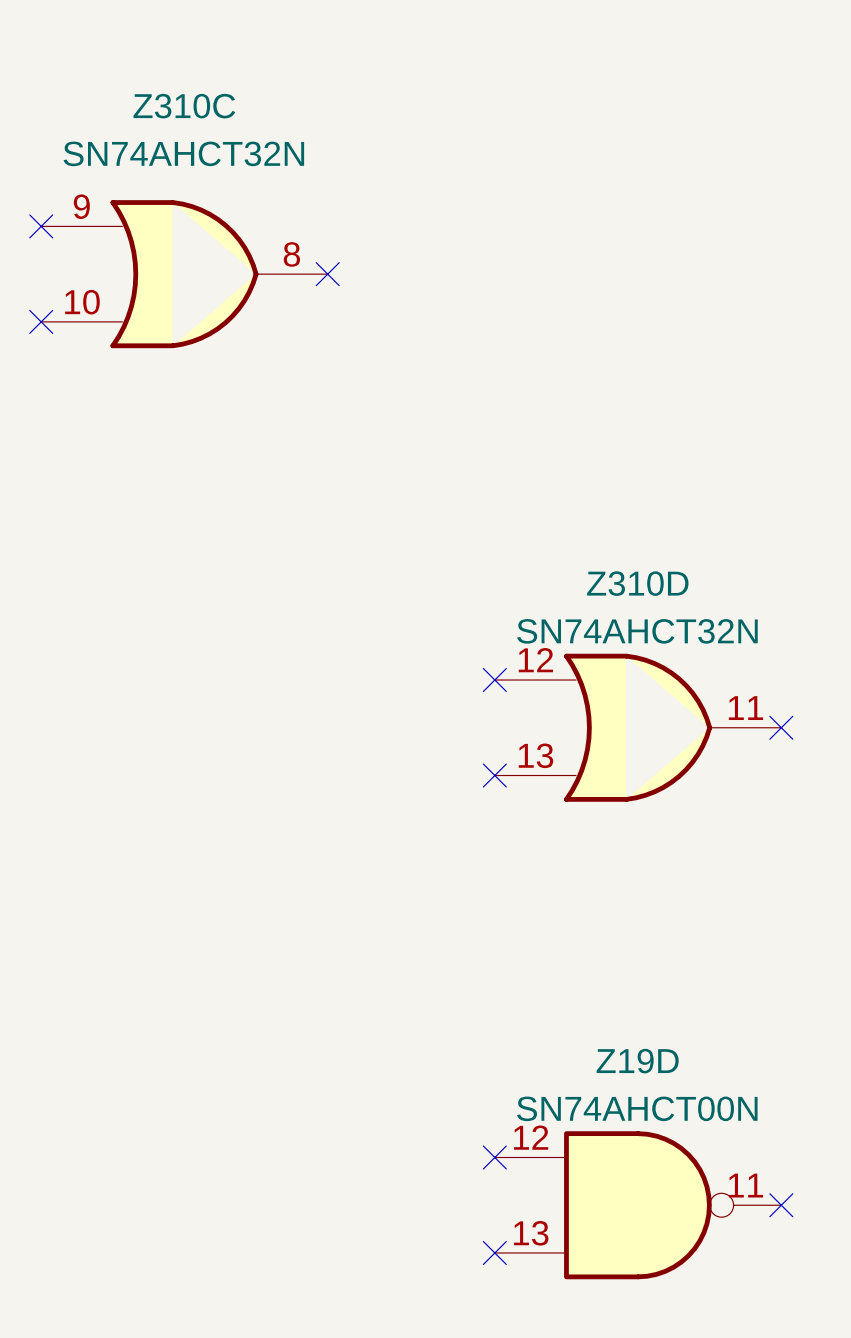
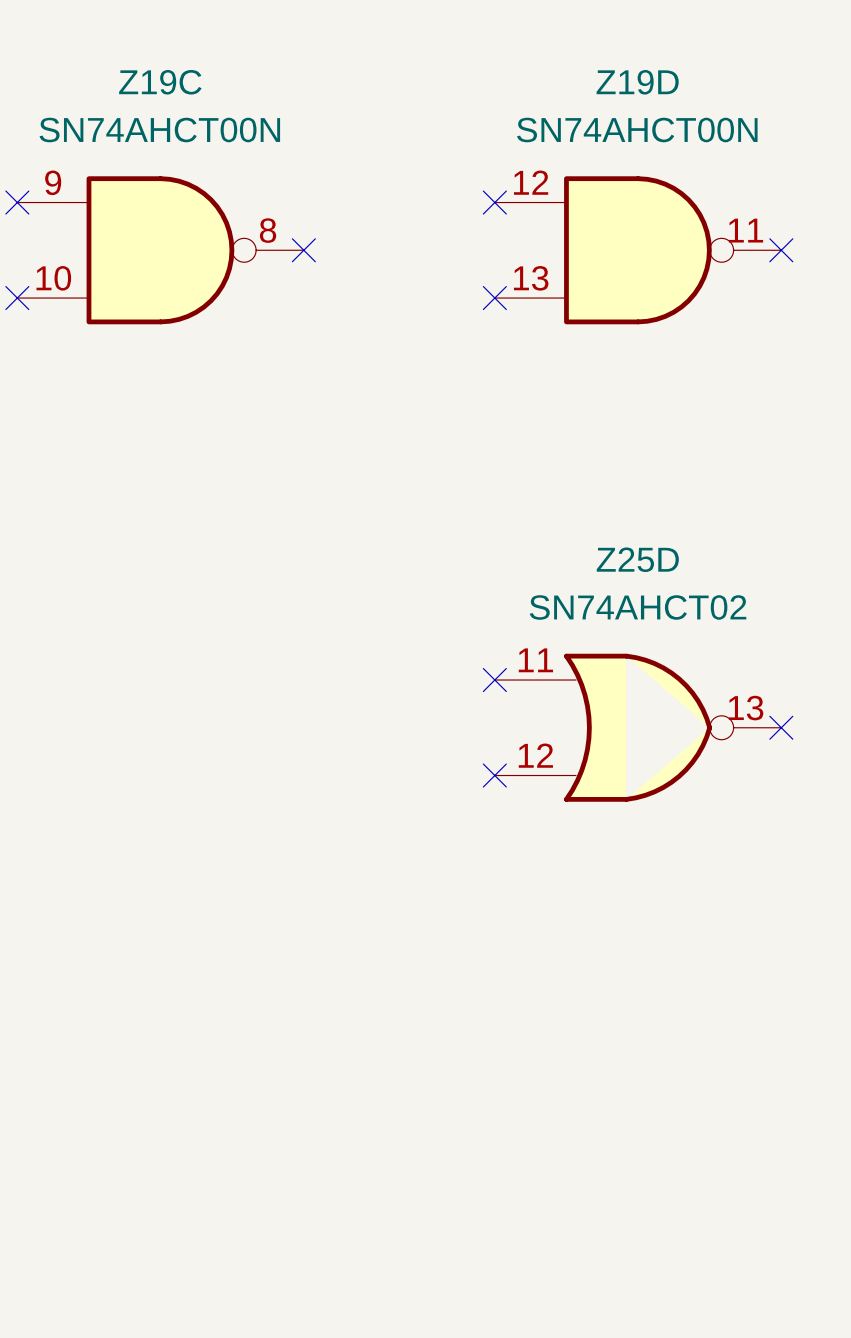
no-connect mark: none -> (494, 202)
no-connect mark position: (41, 226) -> (17, 202)
Z19C: none -> SN74AHCT00N (160, 250)
no-connect mark: none -> (781, 250)
Z310C: SN74AHCT32N (184, 274) -> none
no-connect mark position: (327, 274) -> (303, 250)
no-connect mark: none -> (494, 298)
no-connect mark position: (41, 321) -> (17, 298)
Z310D: SN74AHCT32N (638, 727) -> none
Z25D: none -> SN74AHCT02 (638, 727)
Z19D name position: Z19D (637, 1061) -> Z19D (637, 82)
Z19D value position: SN74AHCT00N (637, 1108) -> SN74AHCT00N (637, 130)
no-connect mark: (494, 1157) -> none
Z19D position: (638, 1205) -> (638, 250)
no-connect mark: (781, 1205) -> none
no-connect mark: (494, 1252) -> none

